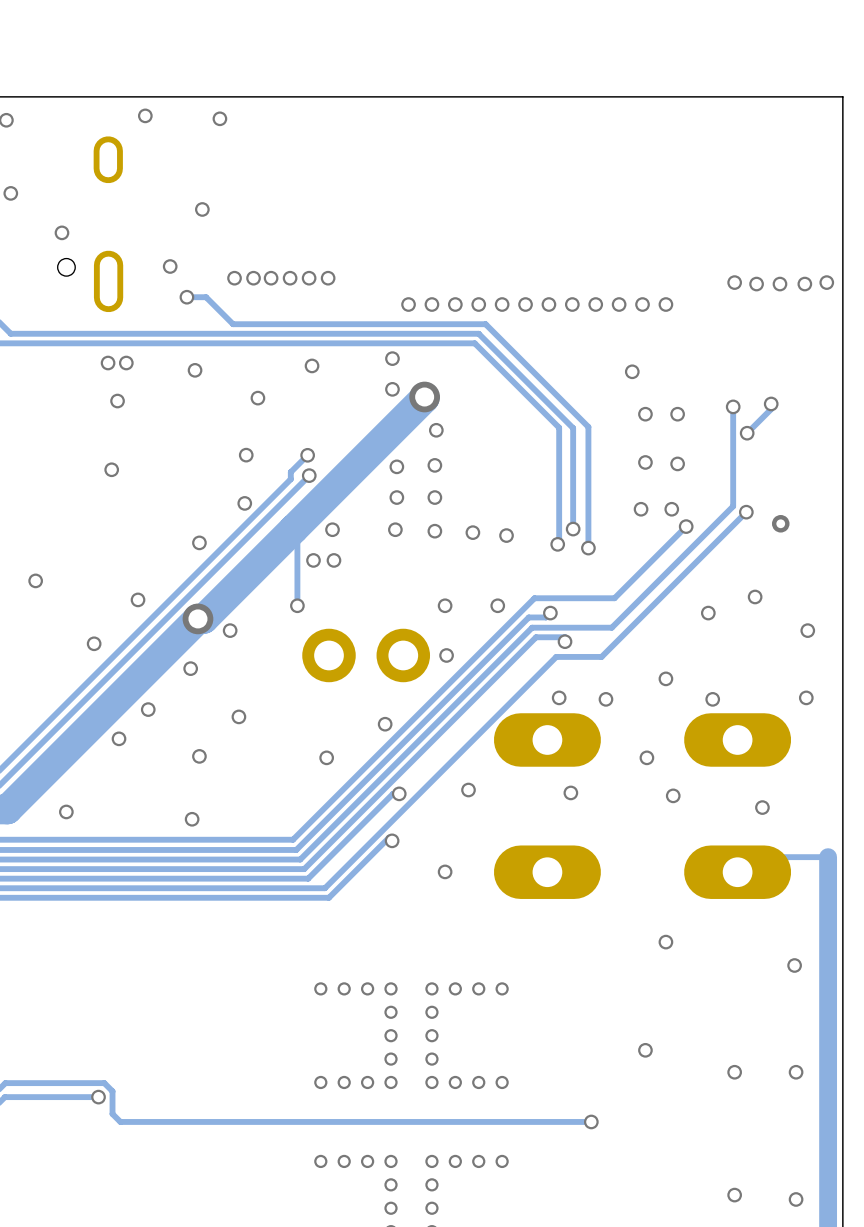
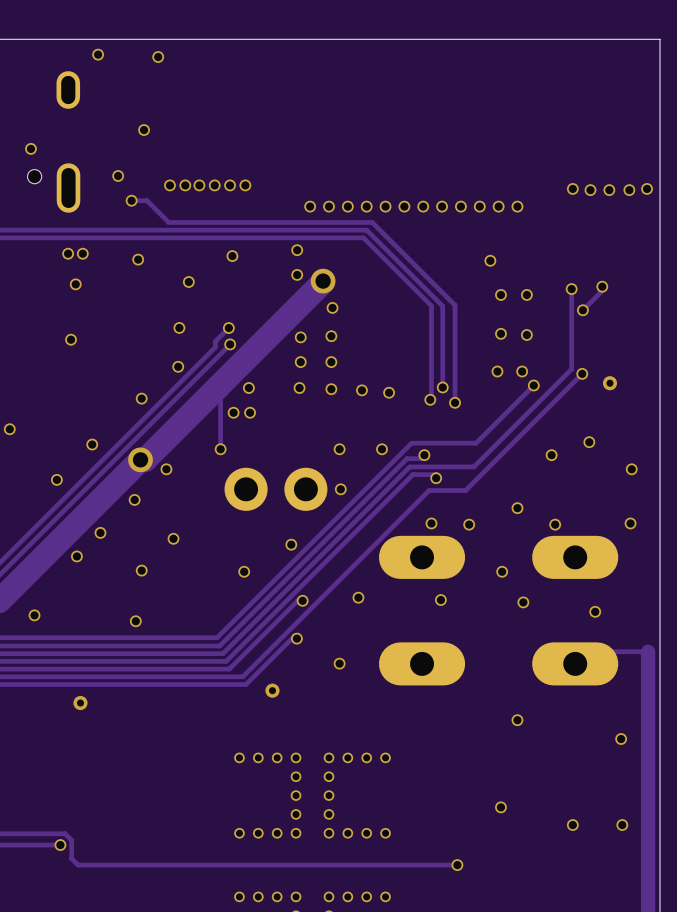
via: none -> (272, 690)
via: none -> (80, 703)

